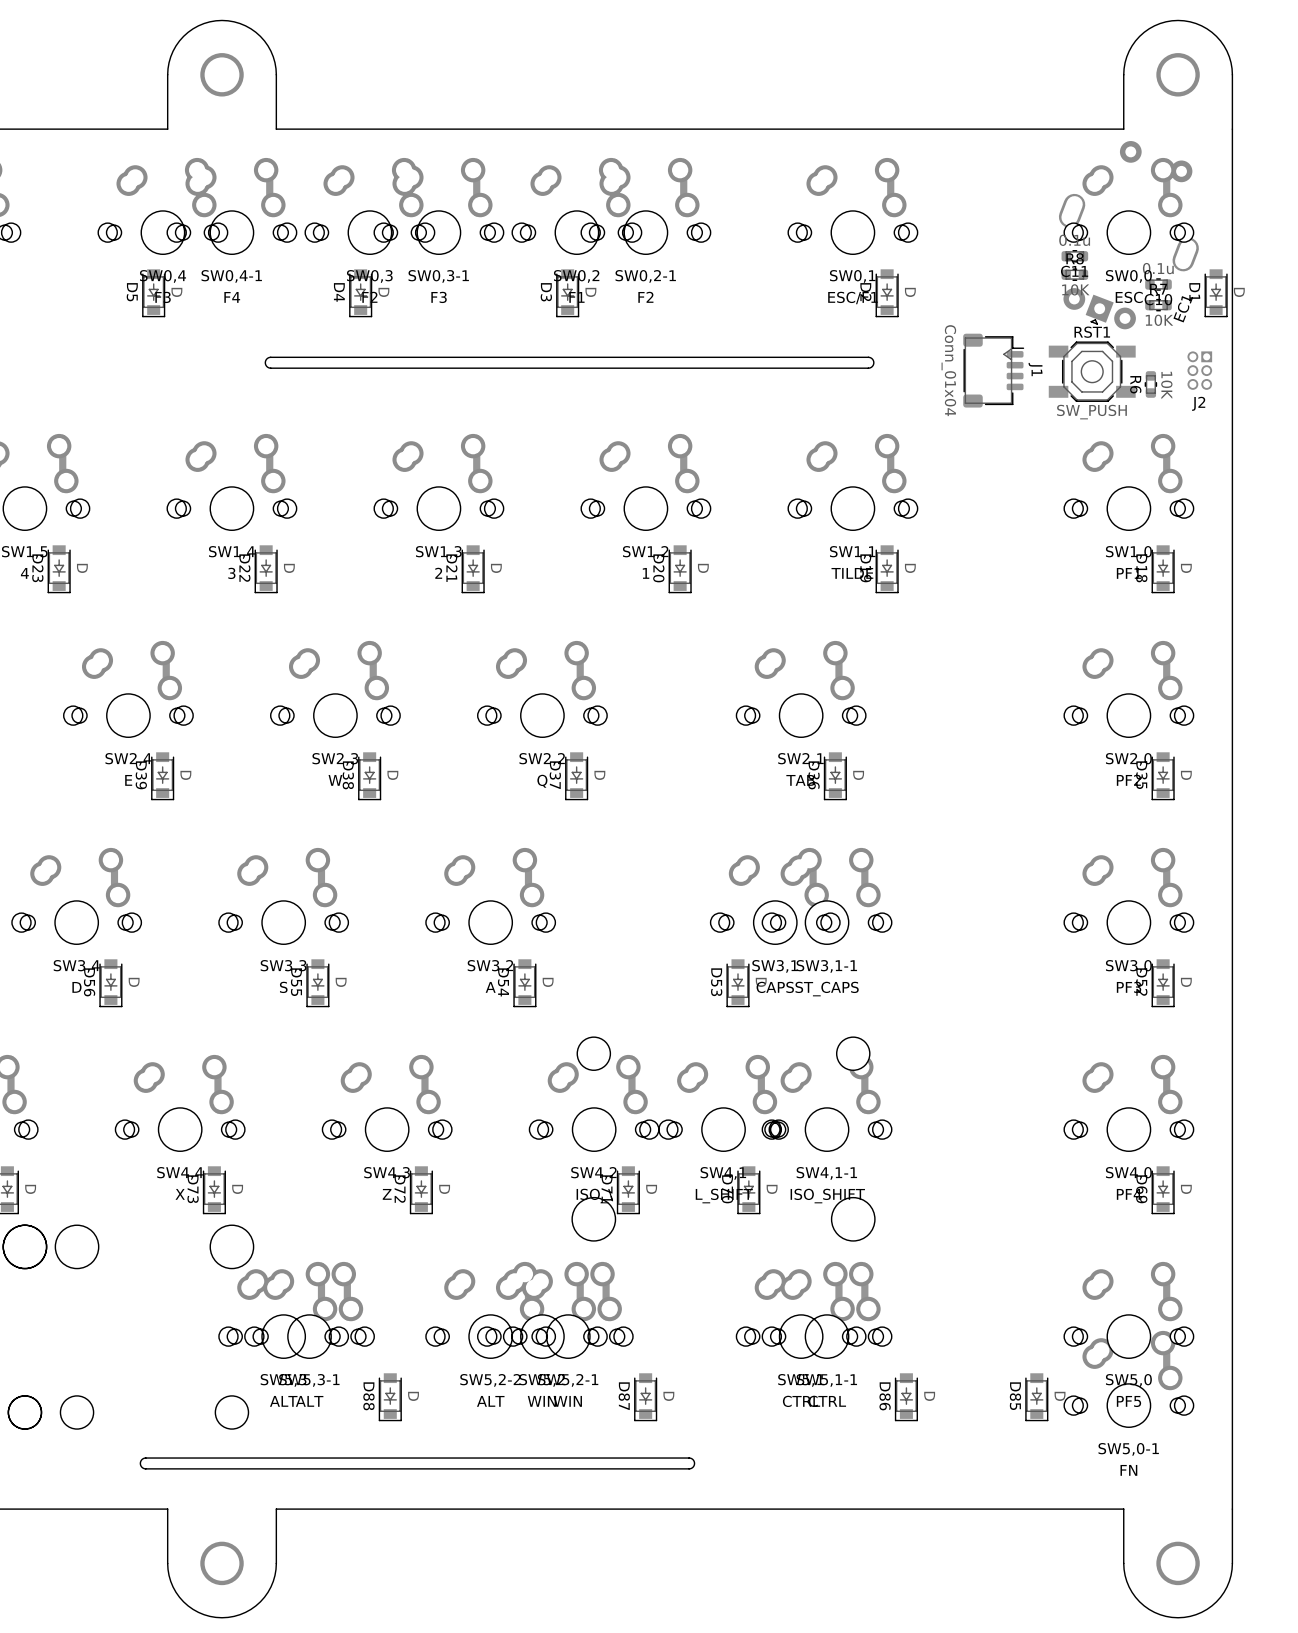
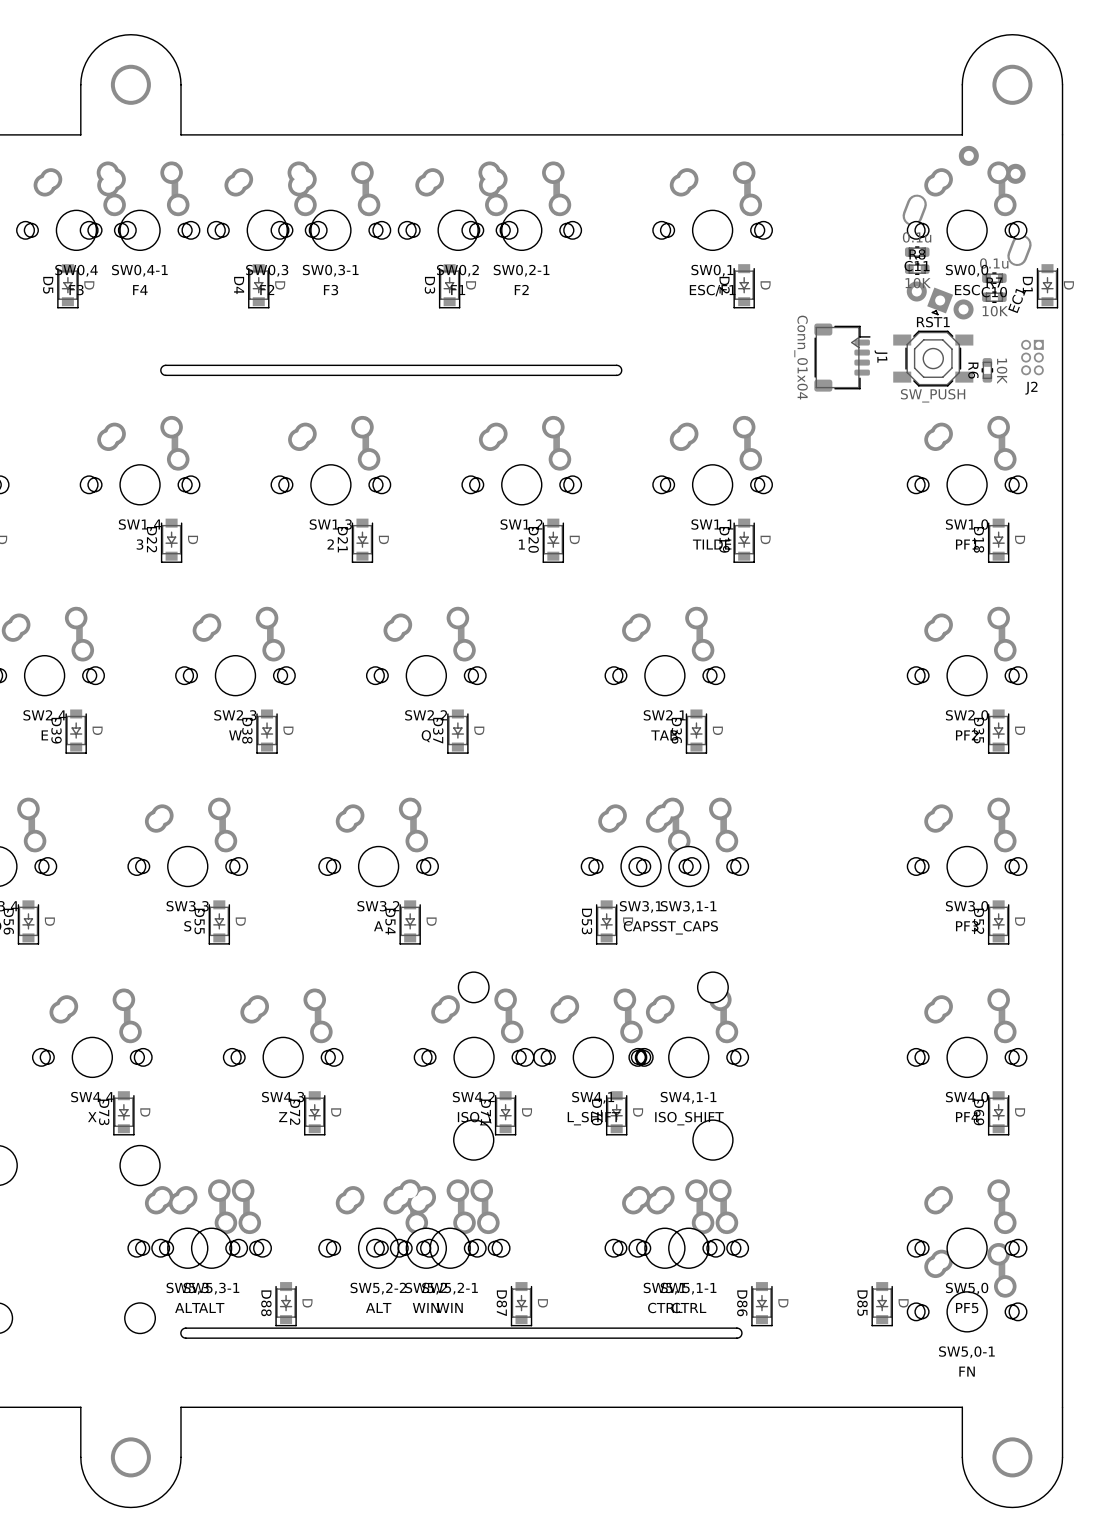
board edge: (868, 357) (270, 357) (266, 358) (265, 362) (266, 366) (270, 368) (868, 368) (872, 366) (873, 362) (872, 358) (868, 357) -> none
board edge: none -> (616, 365) (165, 365) (160, 370) (165, 375) (616, 375) (621, 370) (616, 365)
board edge: none -> (736, 1328) (185, 1328) (180, 1333) (185, 1338) (736, 1338) (741, 1333) (736, 1328)
board edge: (689, 1458) (145, 1458) (141, 1459) (140, 1463) (141, 1467) (145, 1468) (689, 1468) (692, 1467) (694, 1463) (692, 1459) (689, 1458) -> none

